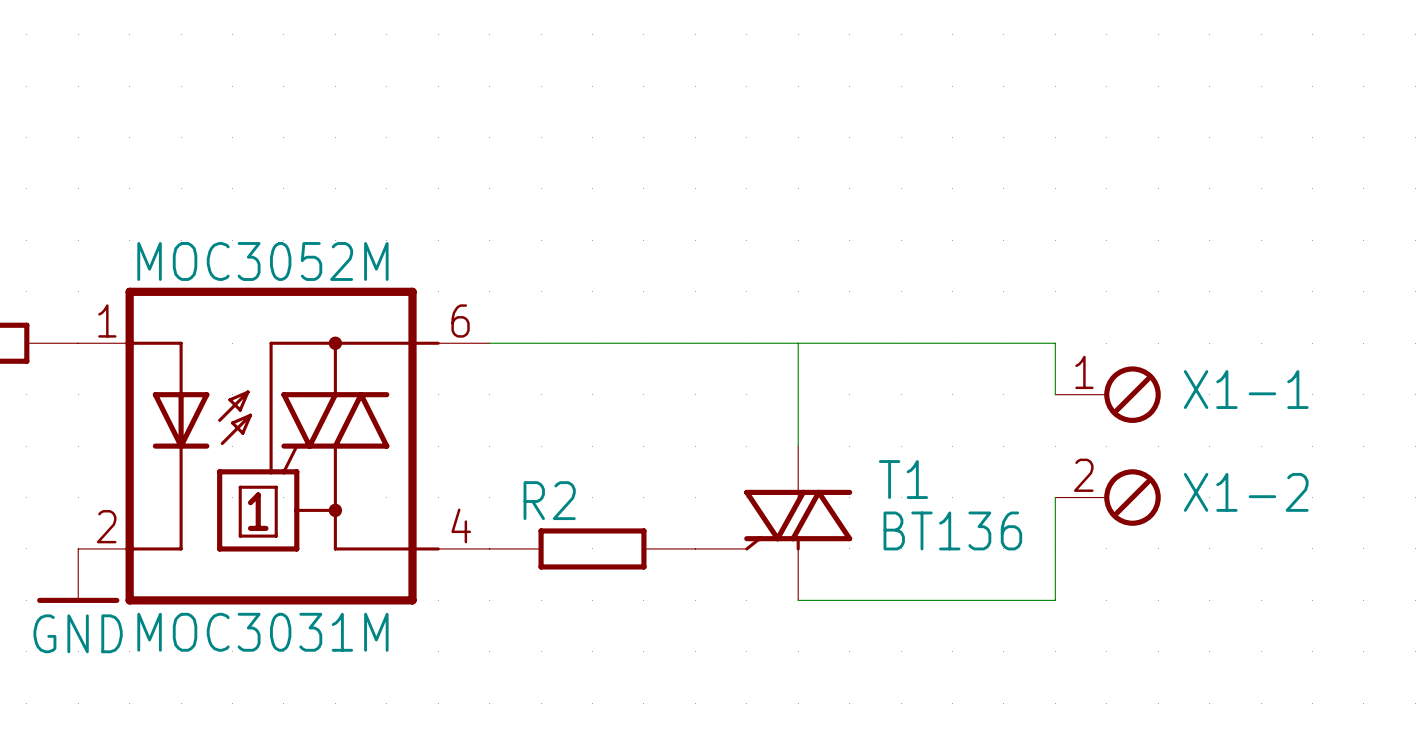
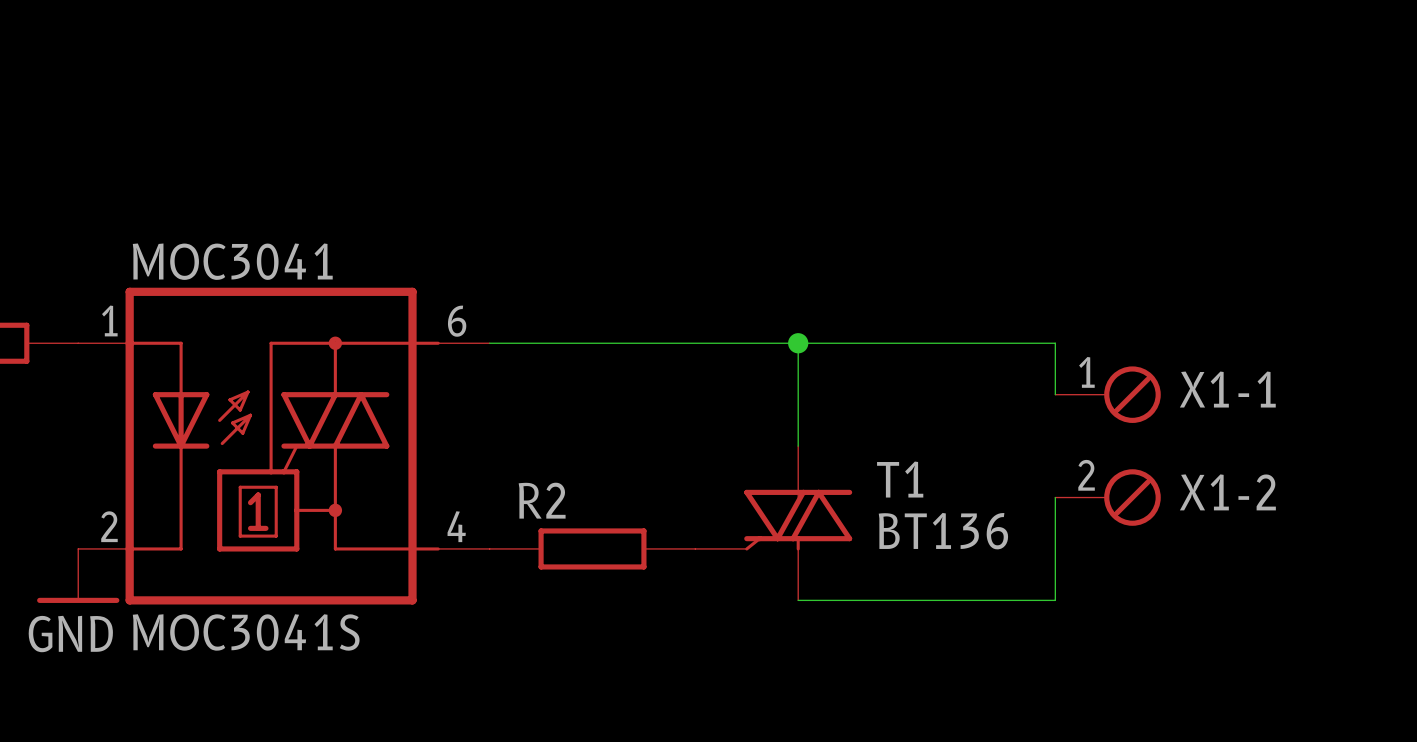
MOC3052M name: MOC3052M (262, 261) -> MOC3041 (232, 261)
junction: none -> (798, 343)
MOC3052M value: MOC3031M (262, 632) -> MOC3041S (246, 632)

